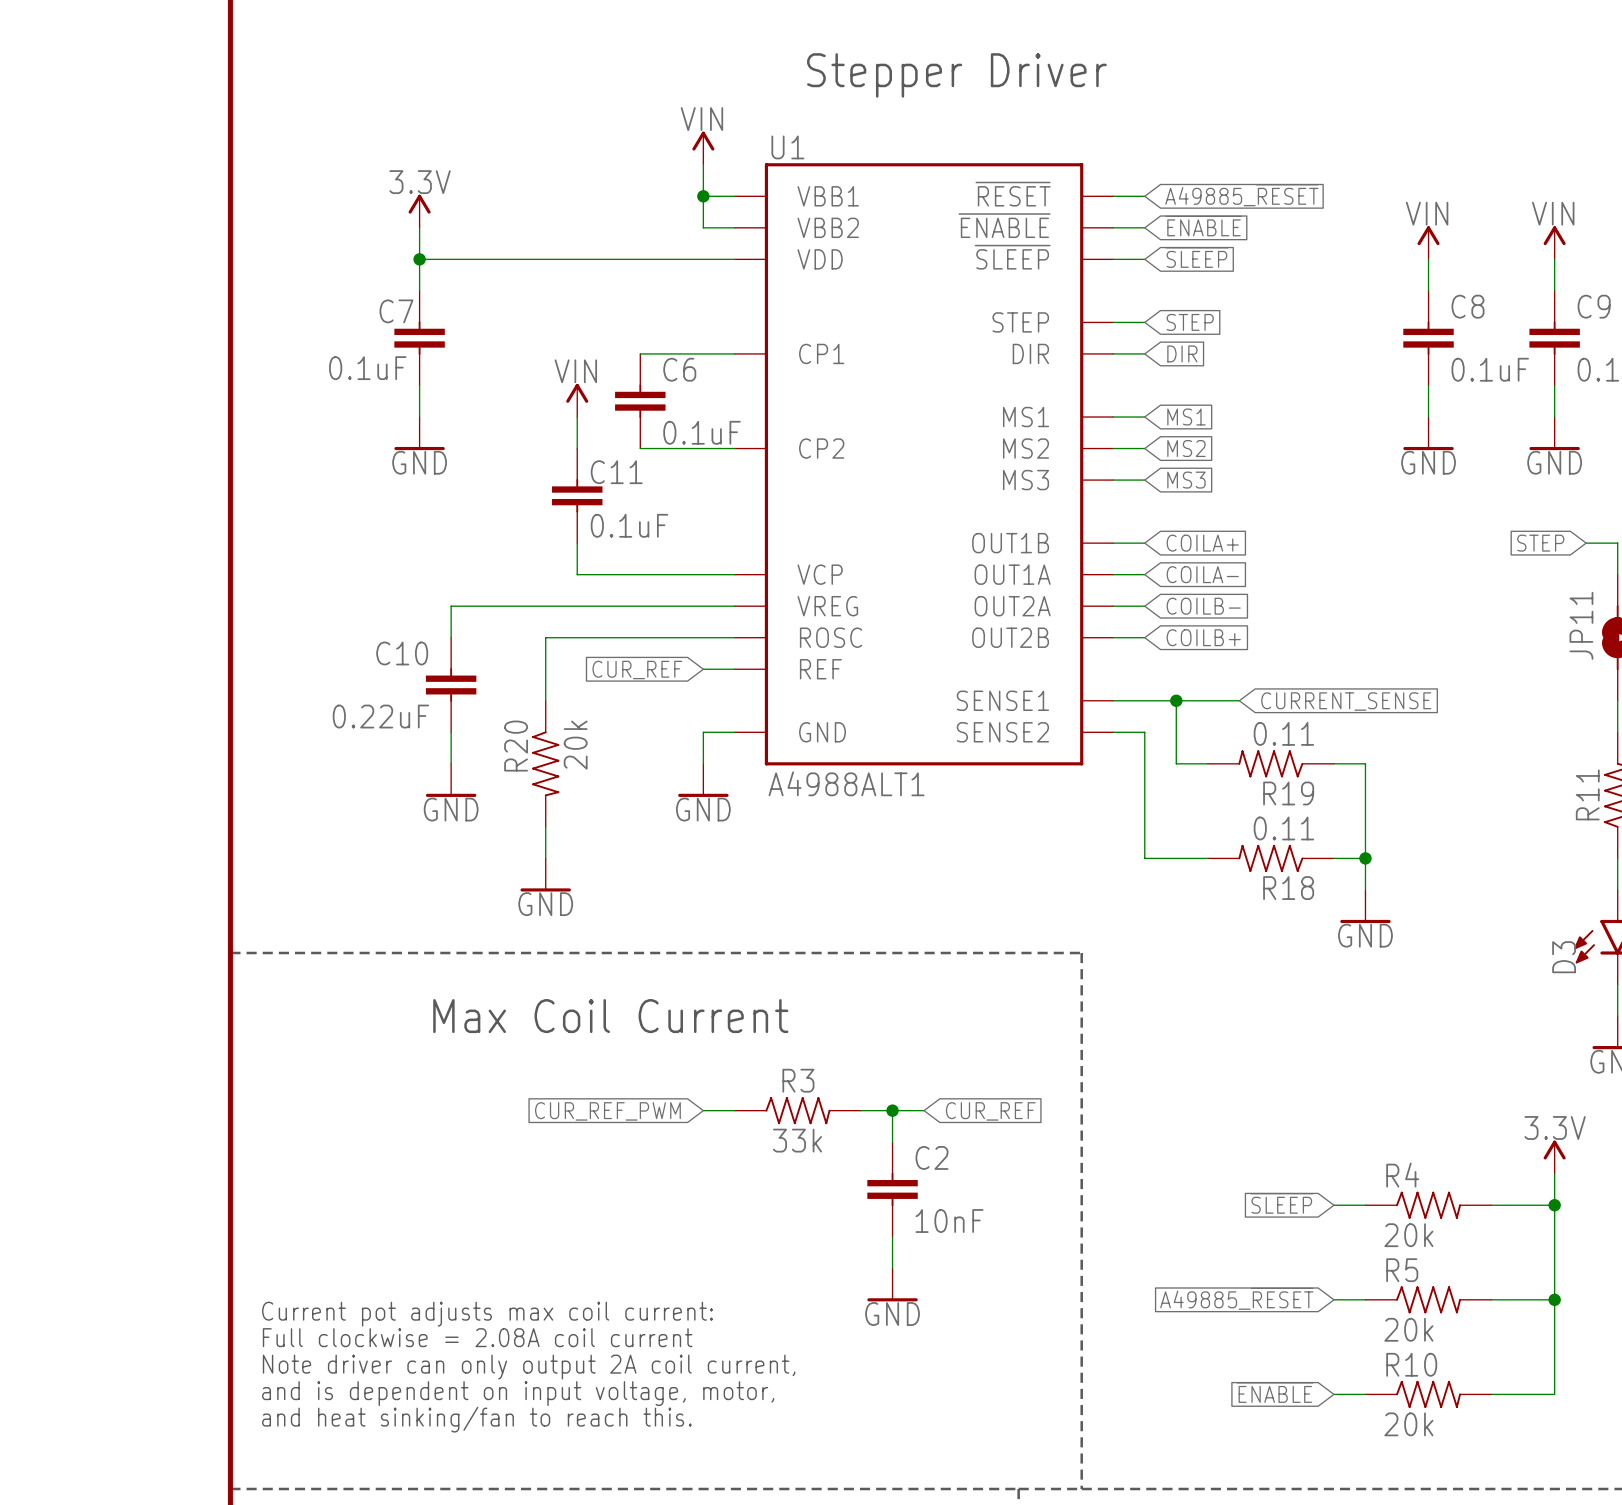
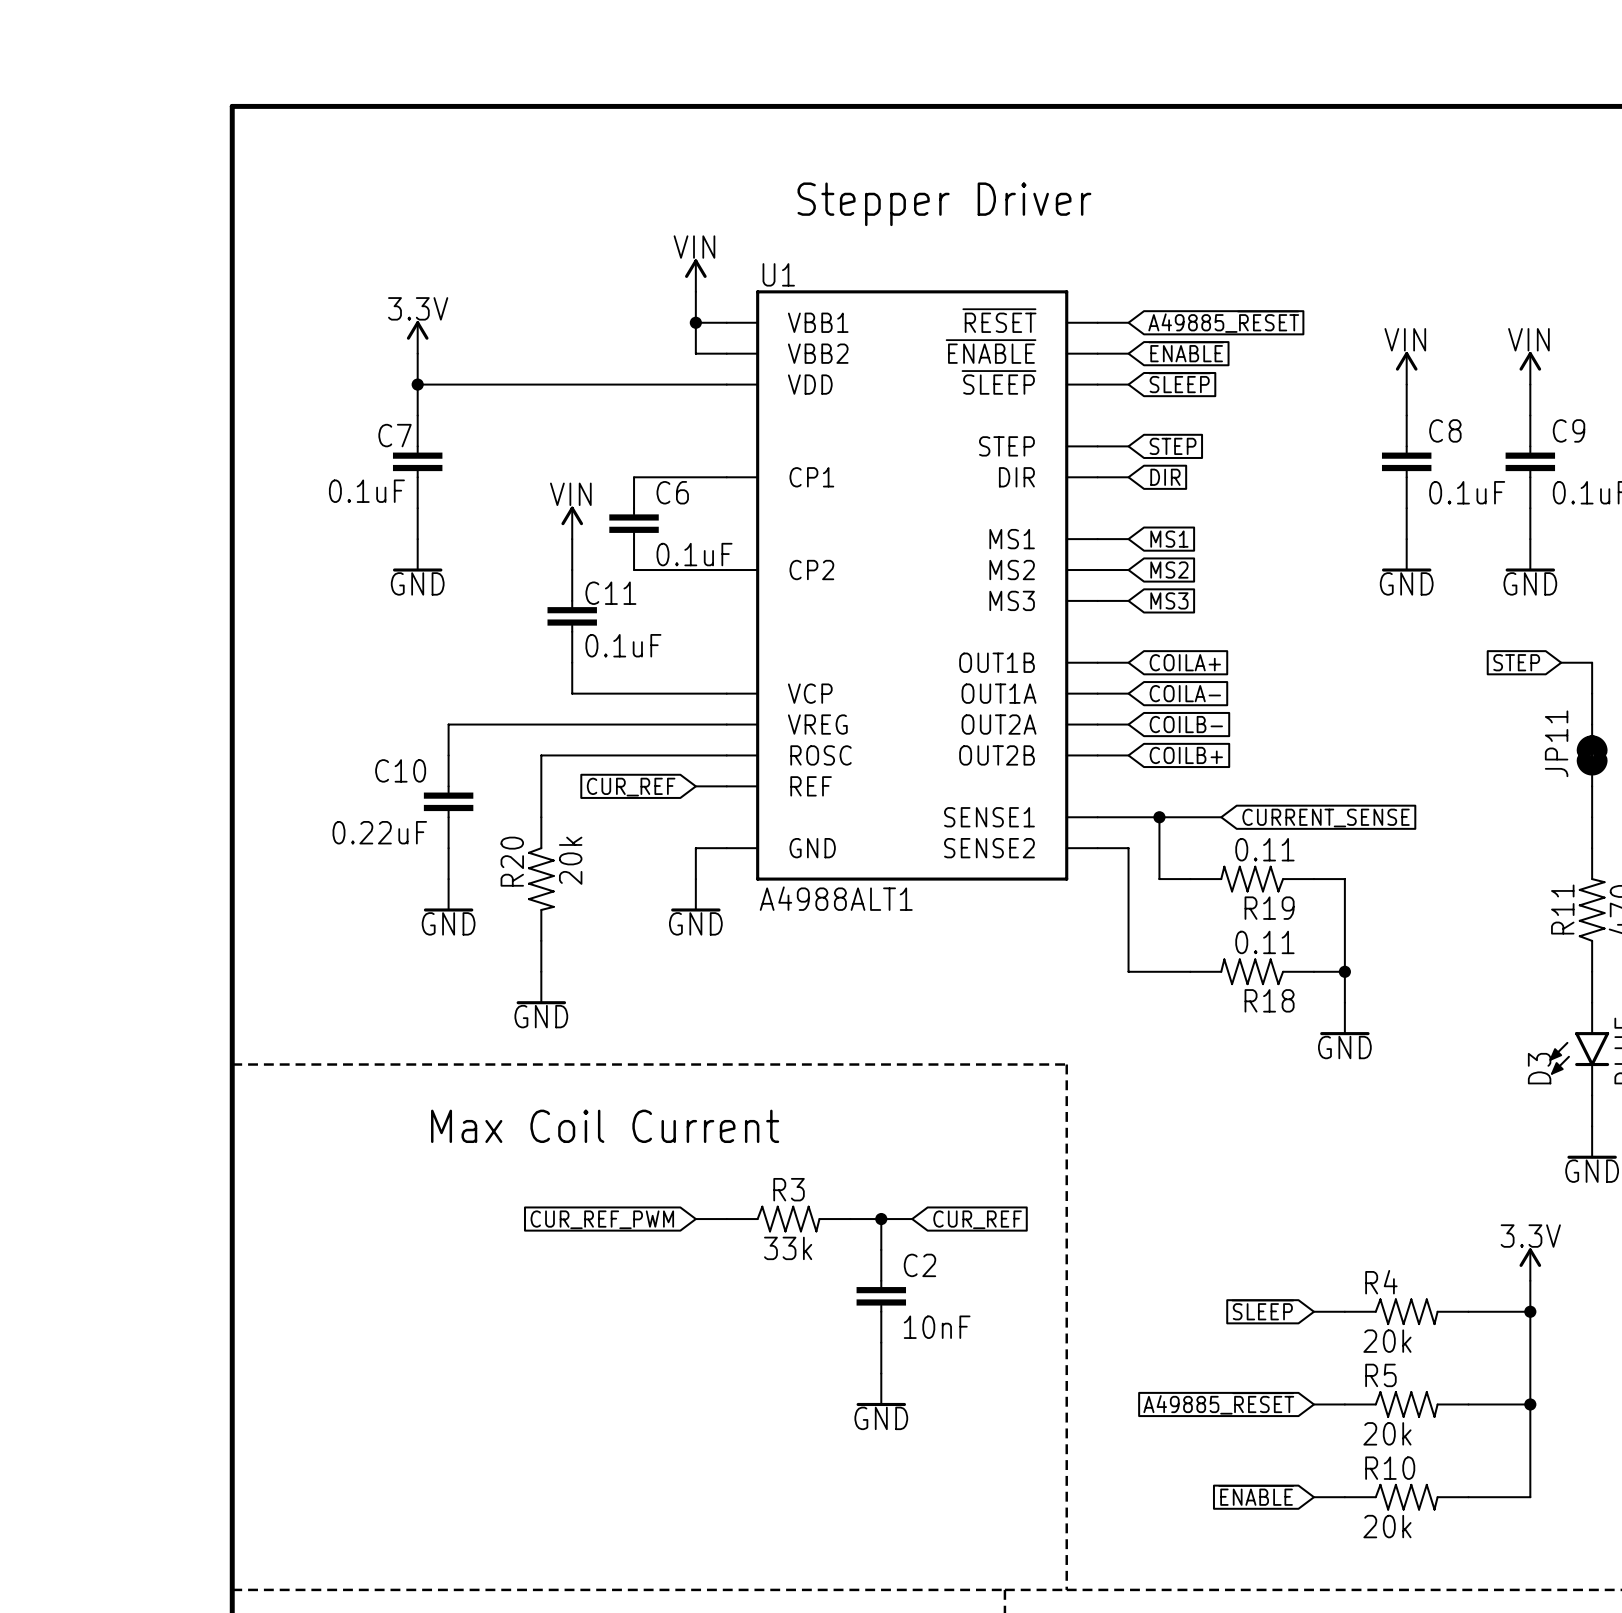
text: Current pot adjusts max coil current: (487, 1314) -> none
text: Full clockwise = 2.08A coil current (477, 1337) -> none
text: Note driver can only output 2A coil current, (529, 1367) -> none
text: and is dependent on input voltage, motor, (518, 1393) -> none
text: and heat sinking/fan to reach this. (476, 1419) -> none

